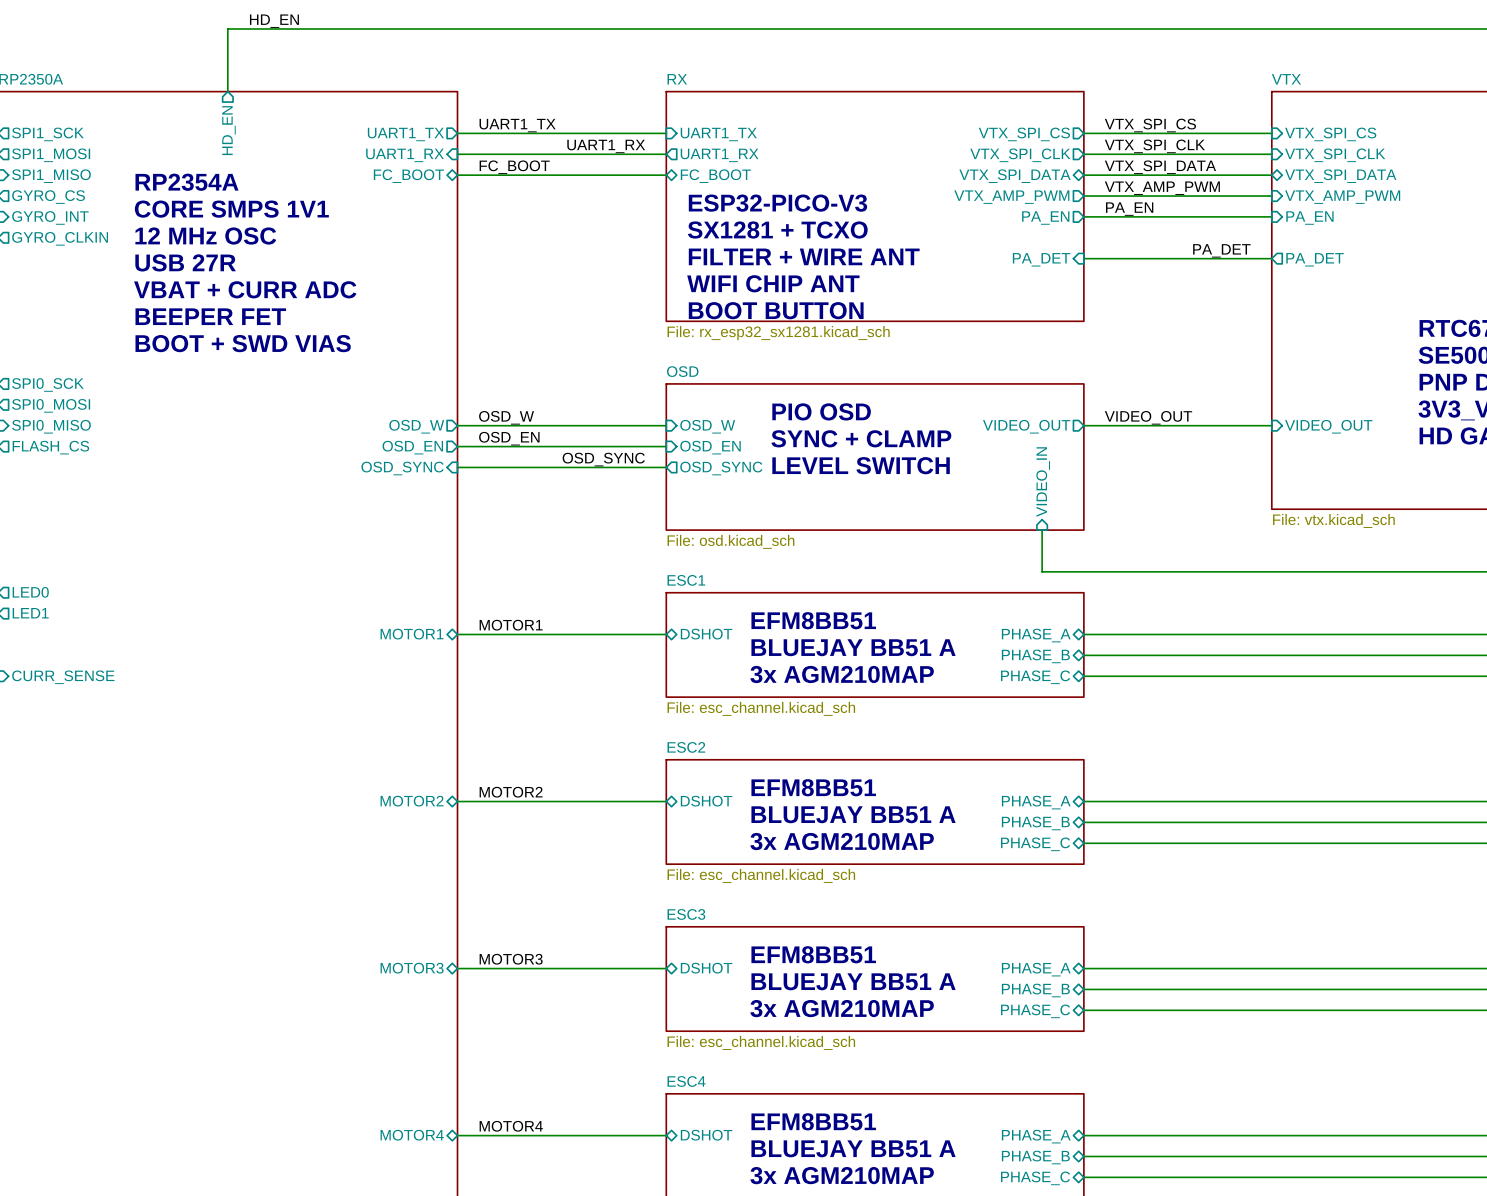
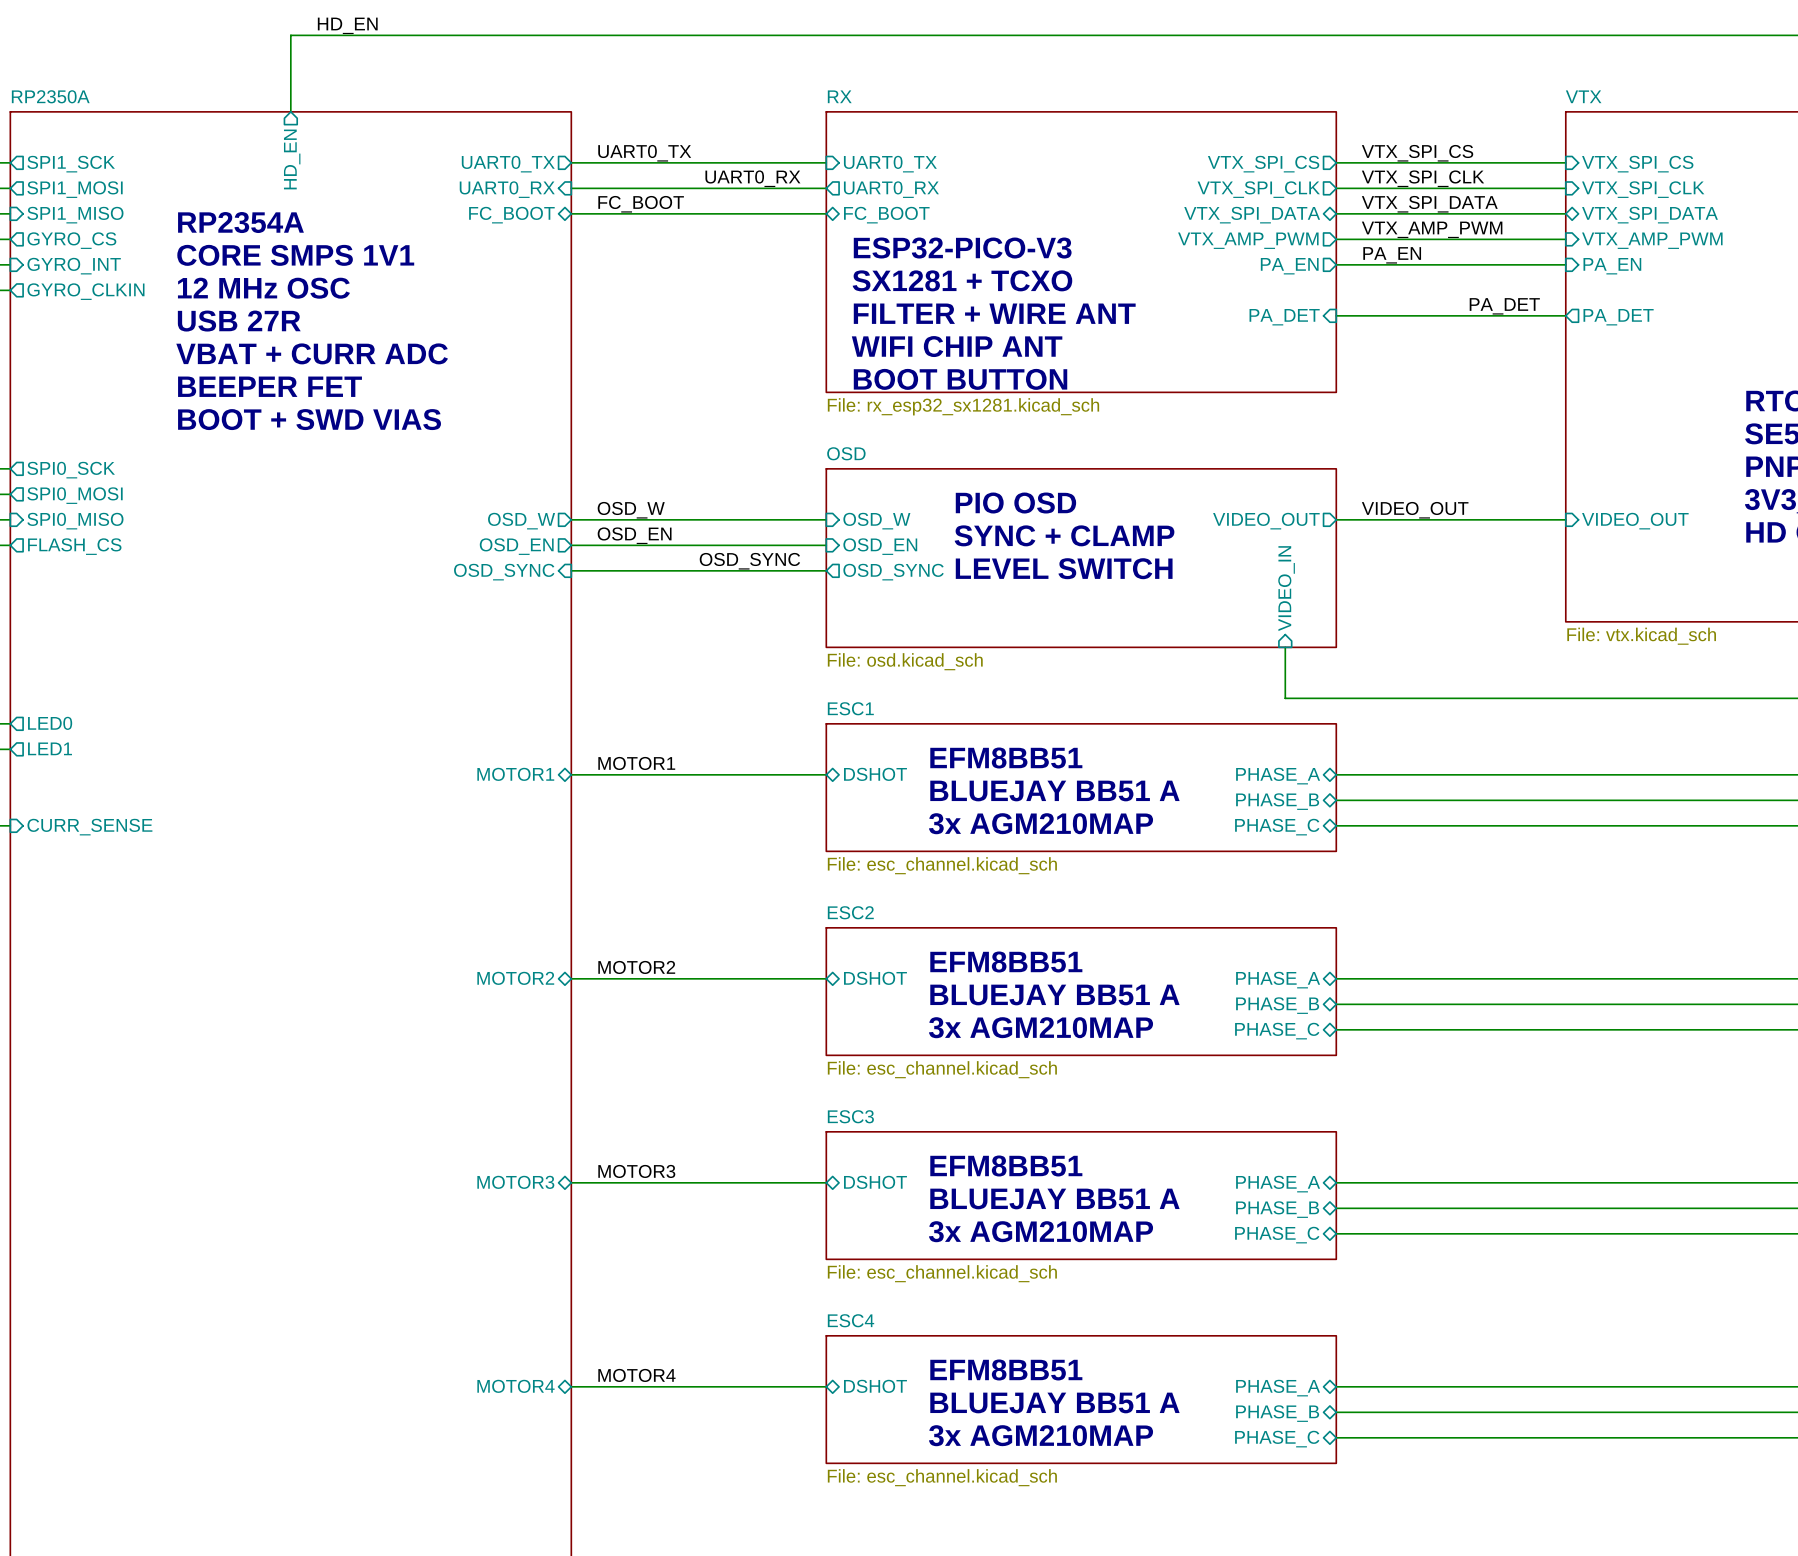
label: UART1_TX (517, 125) -> UART0_TX (644, 153)
sheet pin: UART1_TX (405, 134) -> UART0_TX (508, 164)
sheet pin: UART1_TX (718, 134) -> UART0_TX (890, 164)
label: UART1_RX (606, 146) -> UART0_RX (752, 178)
sheet pin: UART1_RX (405, 155) -> UART0_RX (507, 189)
sheet pin: UART1_RX (719, 155) -> UART0_RX (891, 189)

